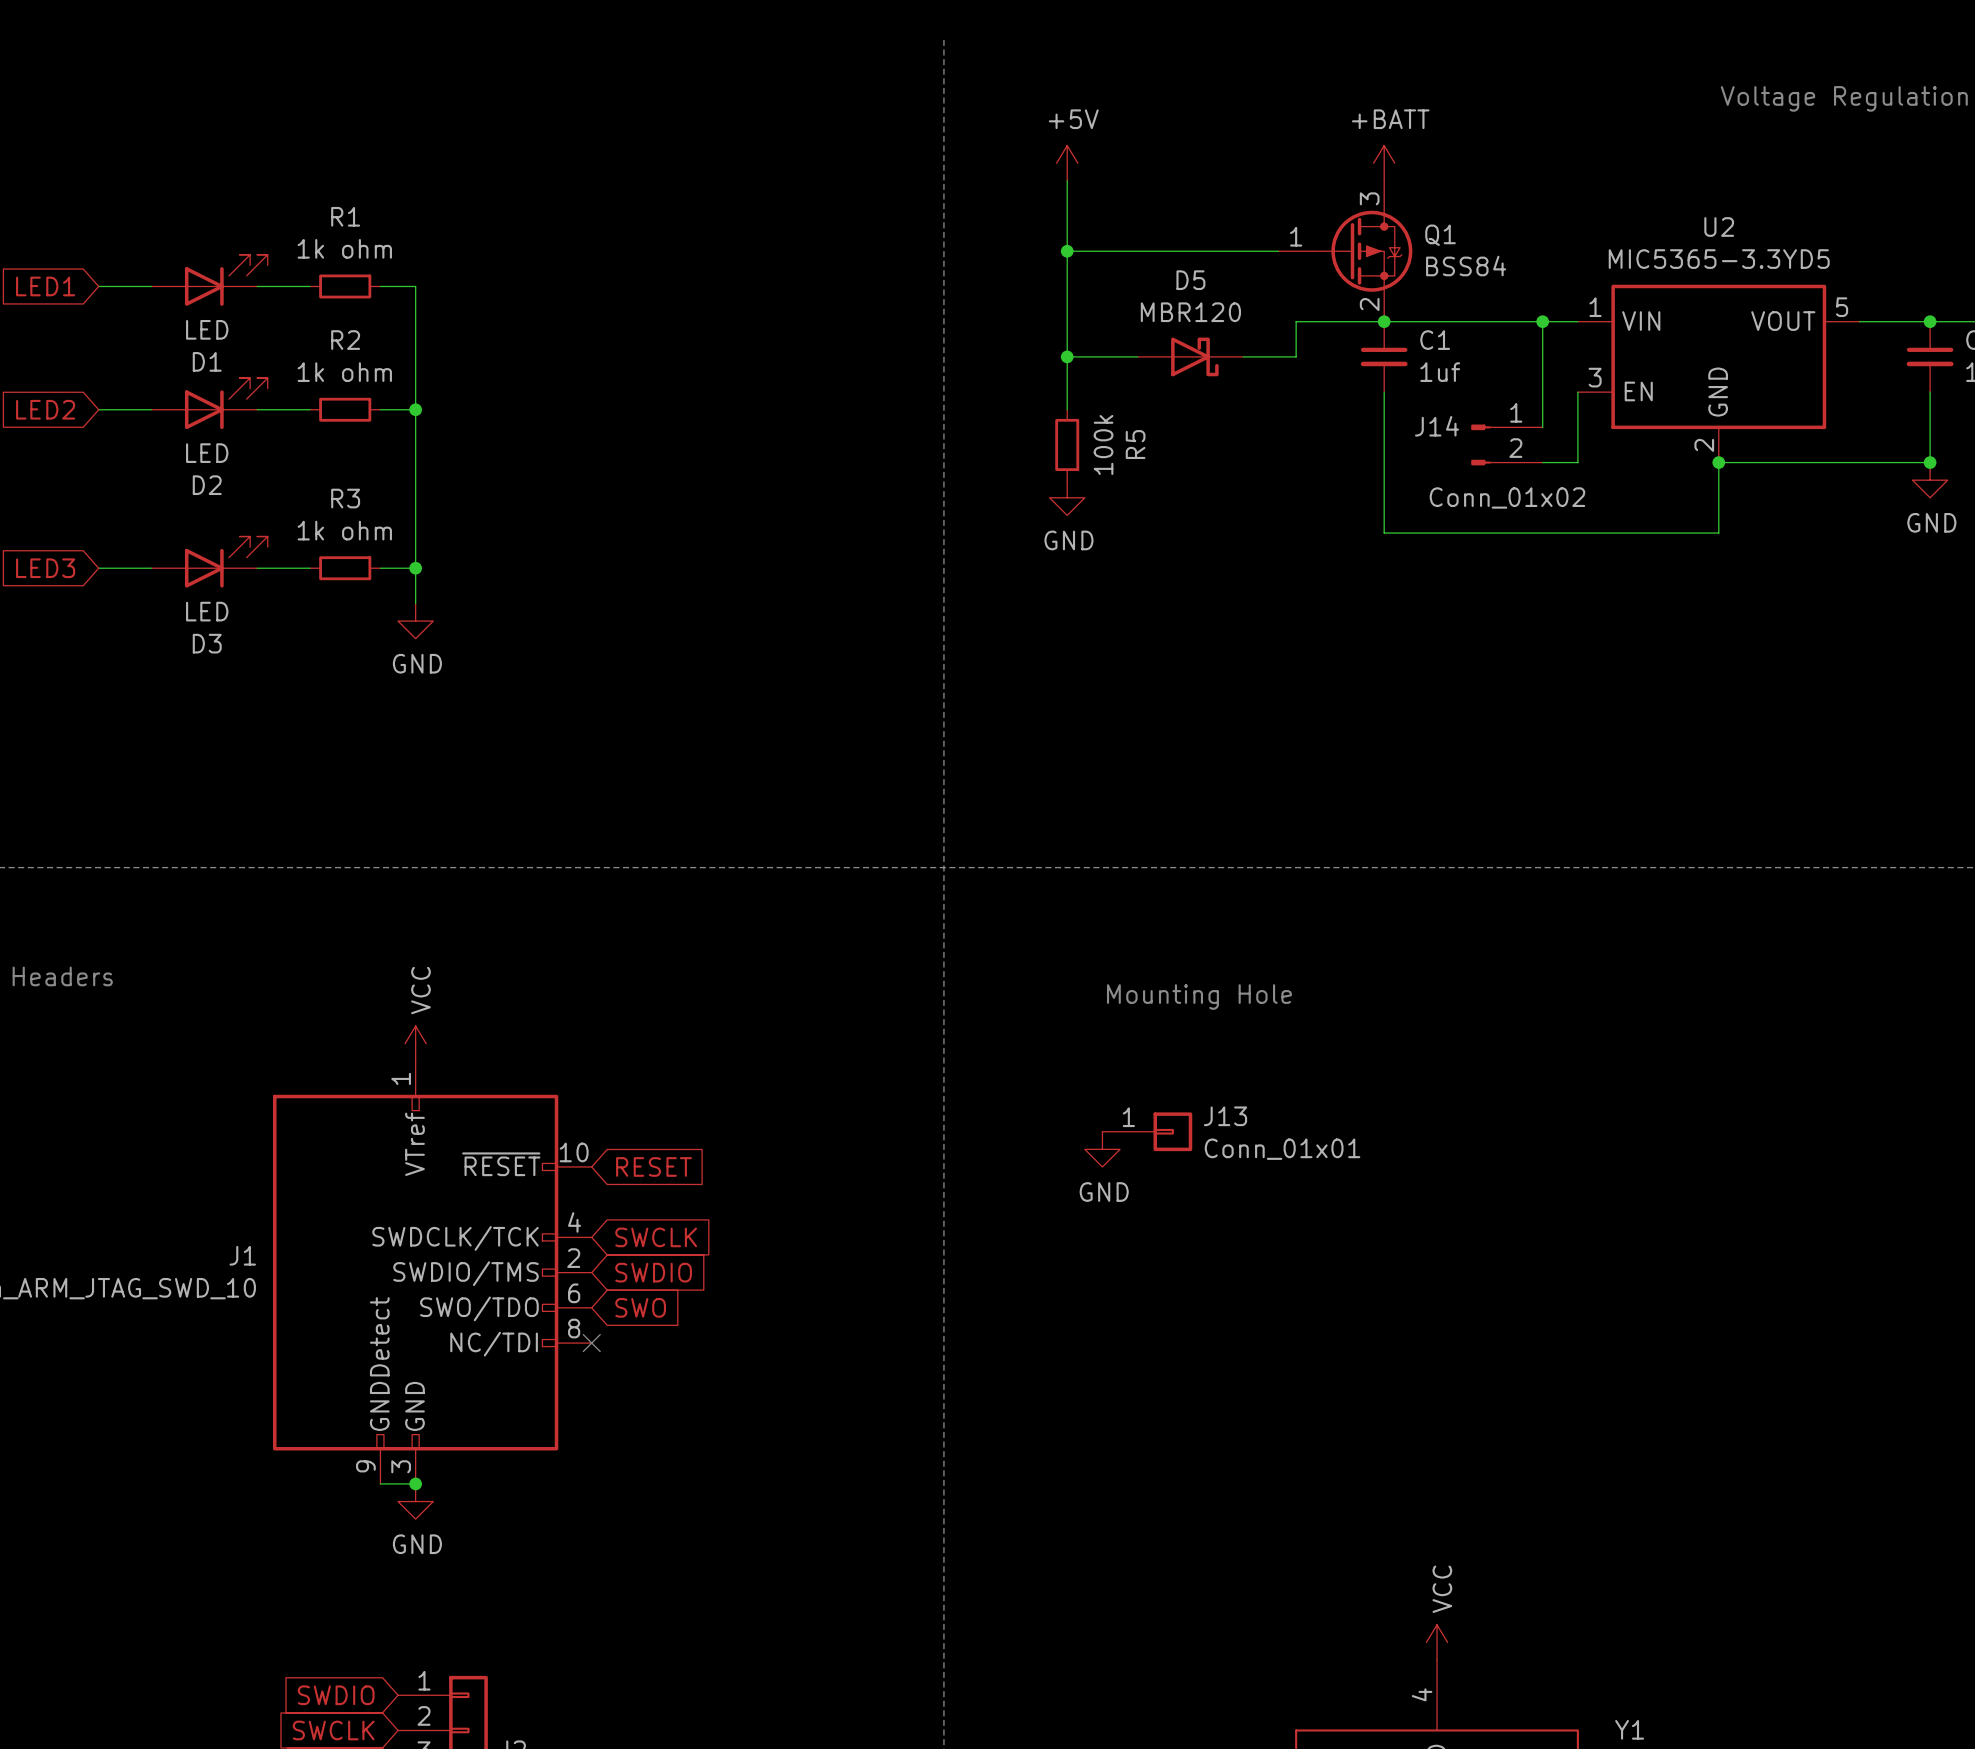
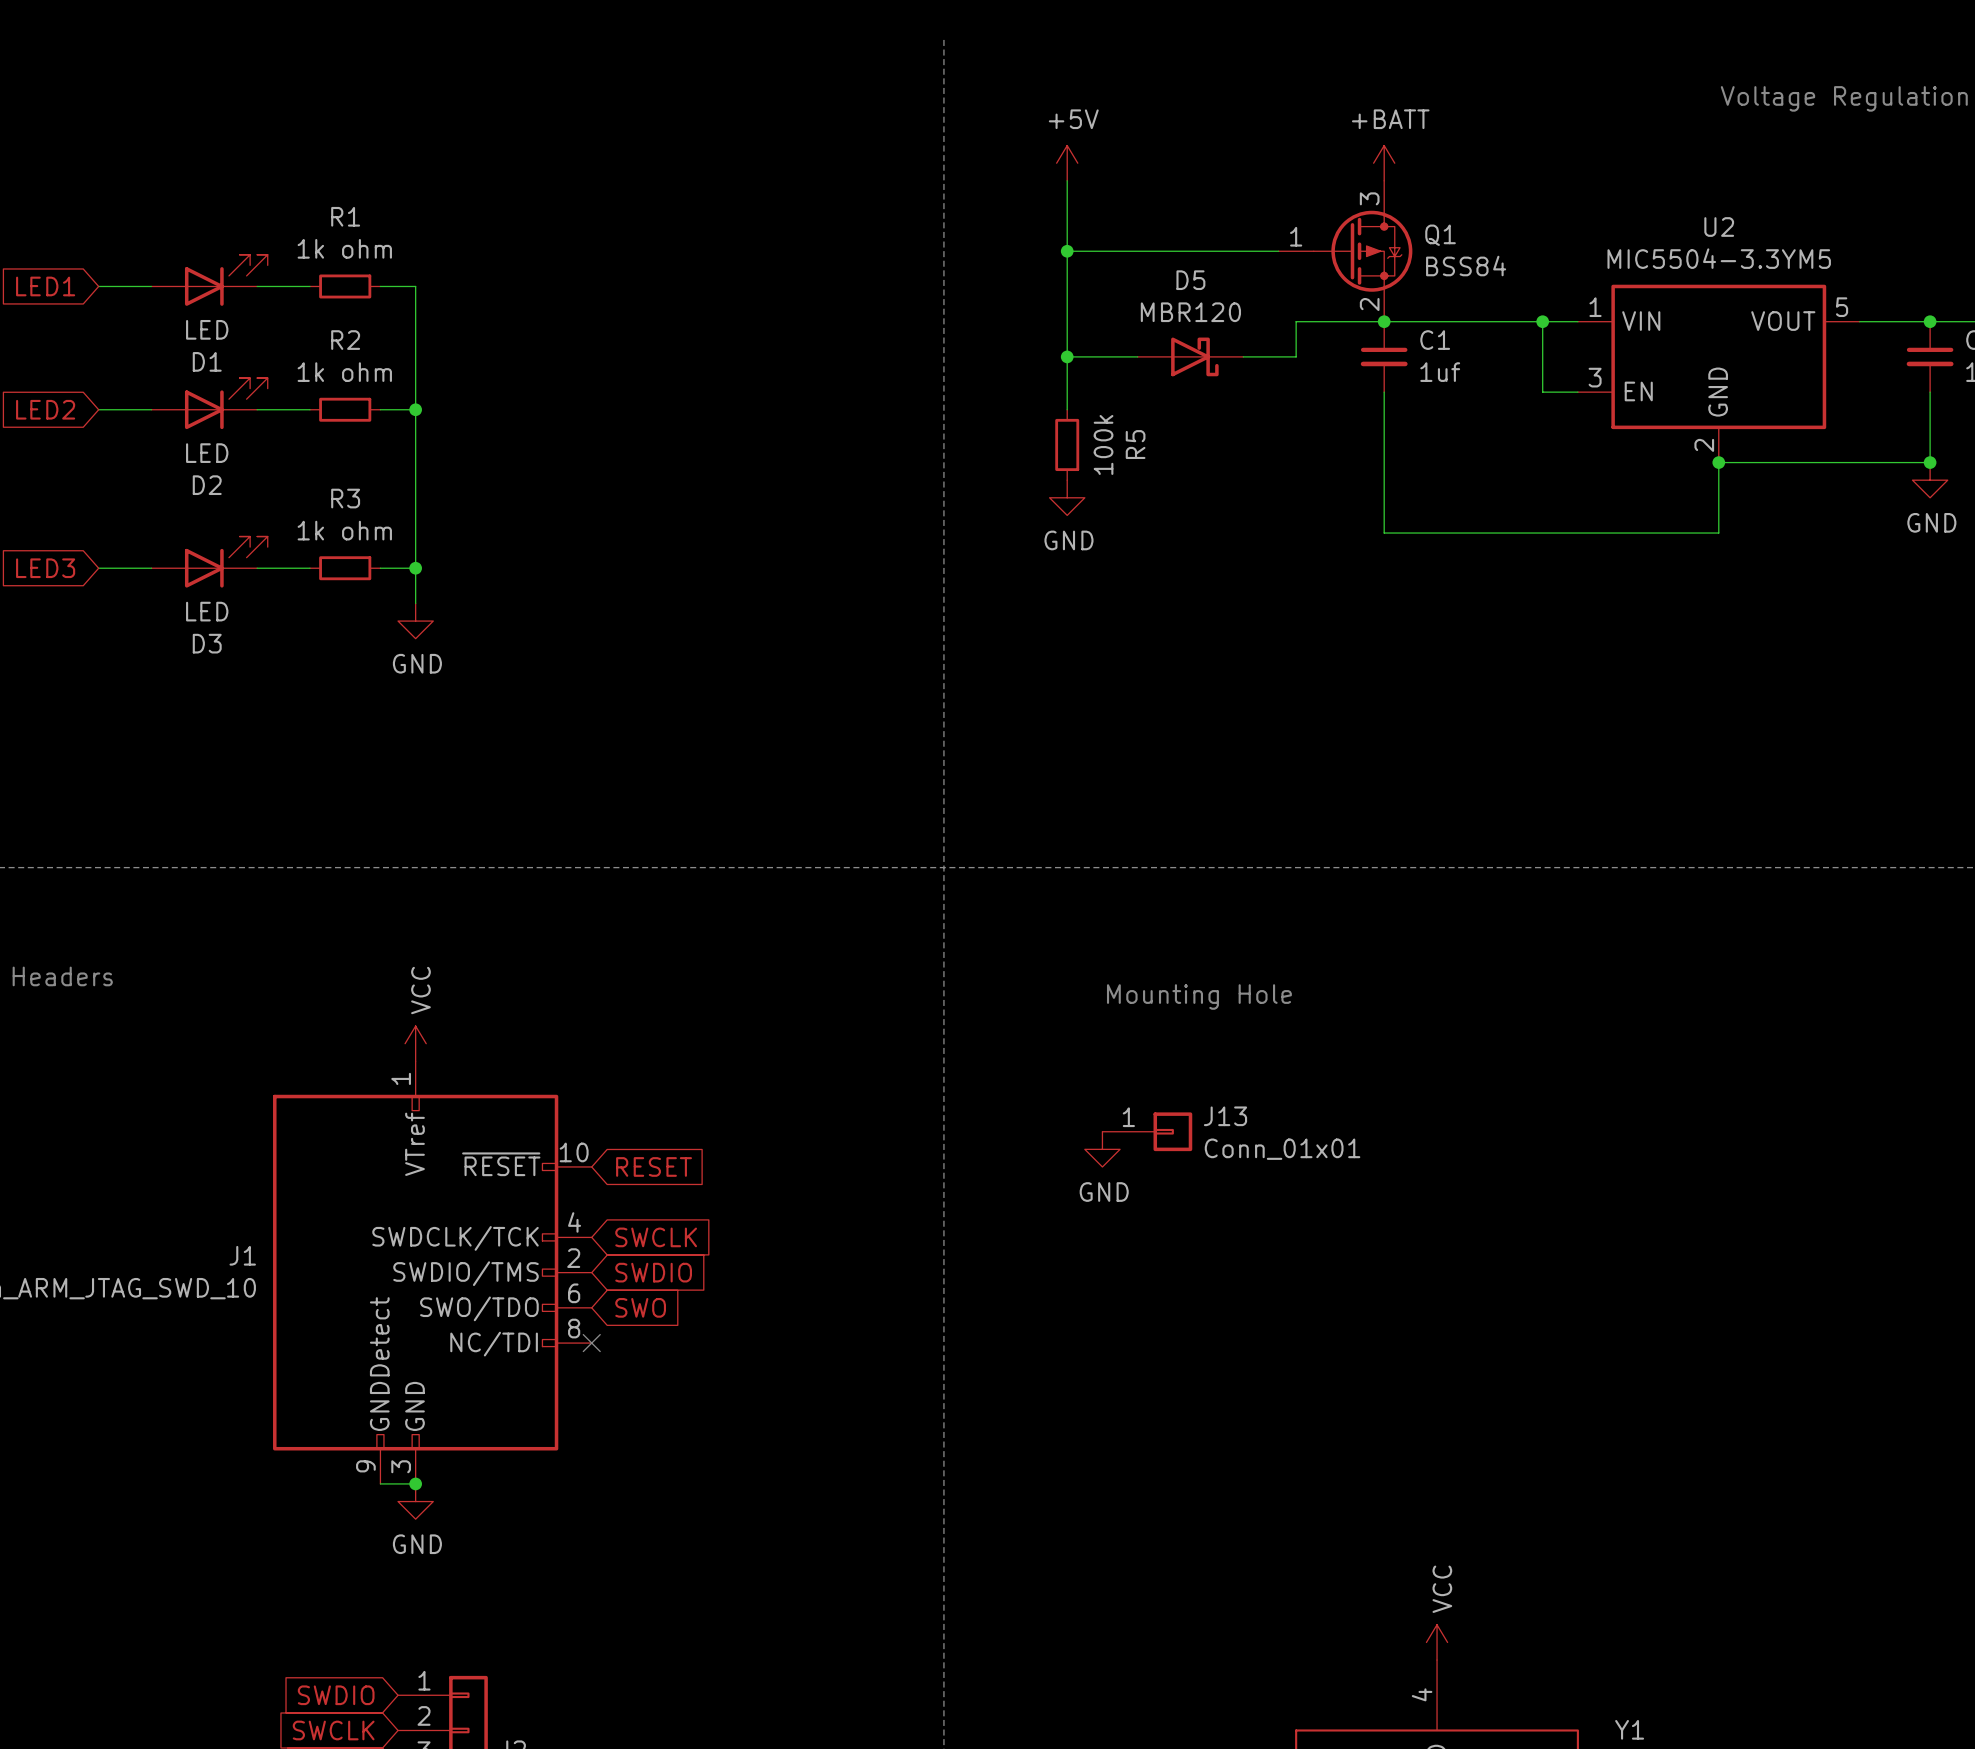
U2 value: MIC5365-3.3YD5 (1719, 259) -> MIC5504-3.3YM5 (1719, 258)
wire: (1542, 392) (1542, 427) -> (1542, 392) (1577, 392)
wire: (1577, 392) (1577, 462) (1542, 462) -> none
J14: Conn_01x02 (1506, 444) -> none

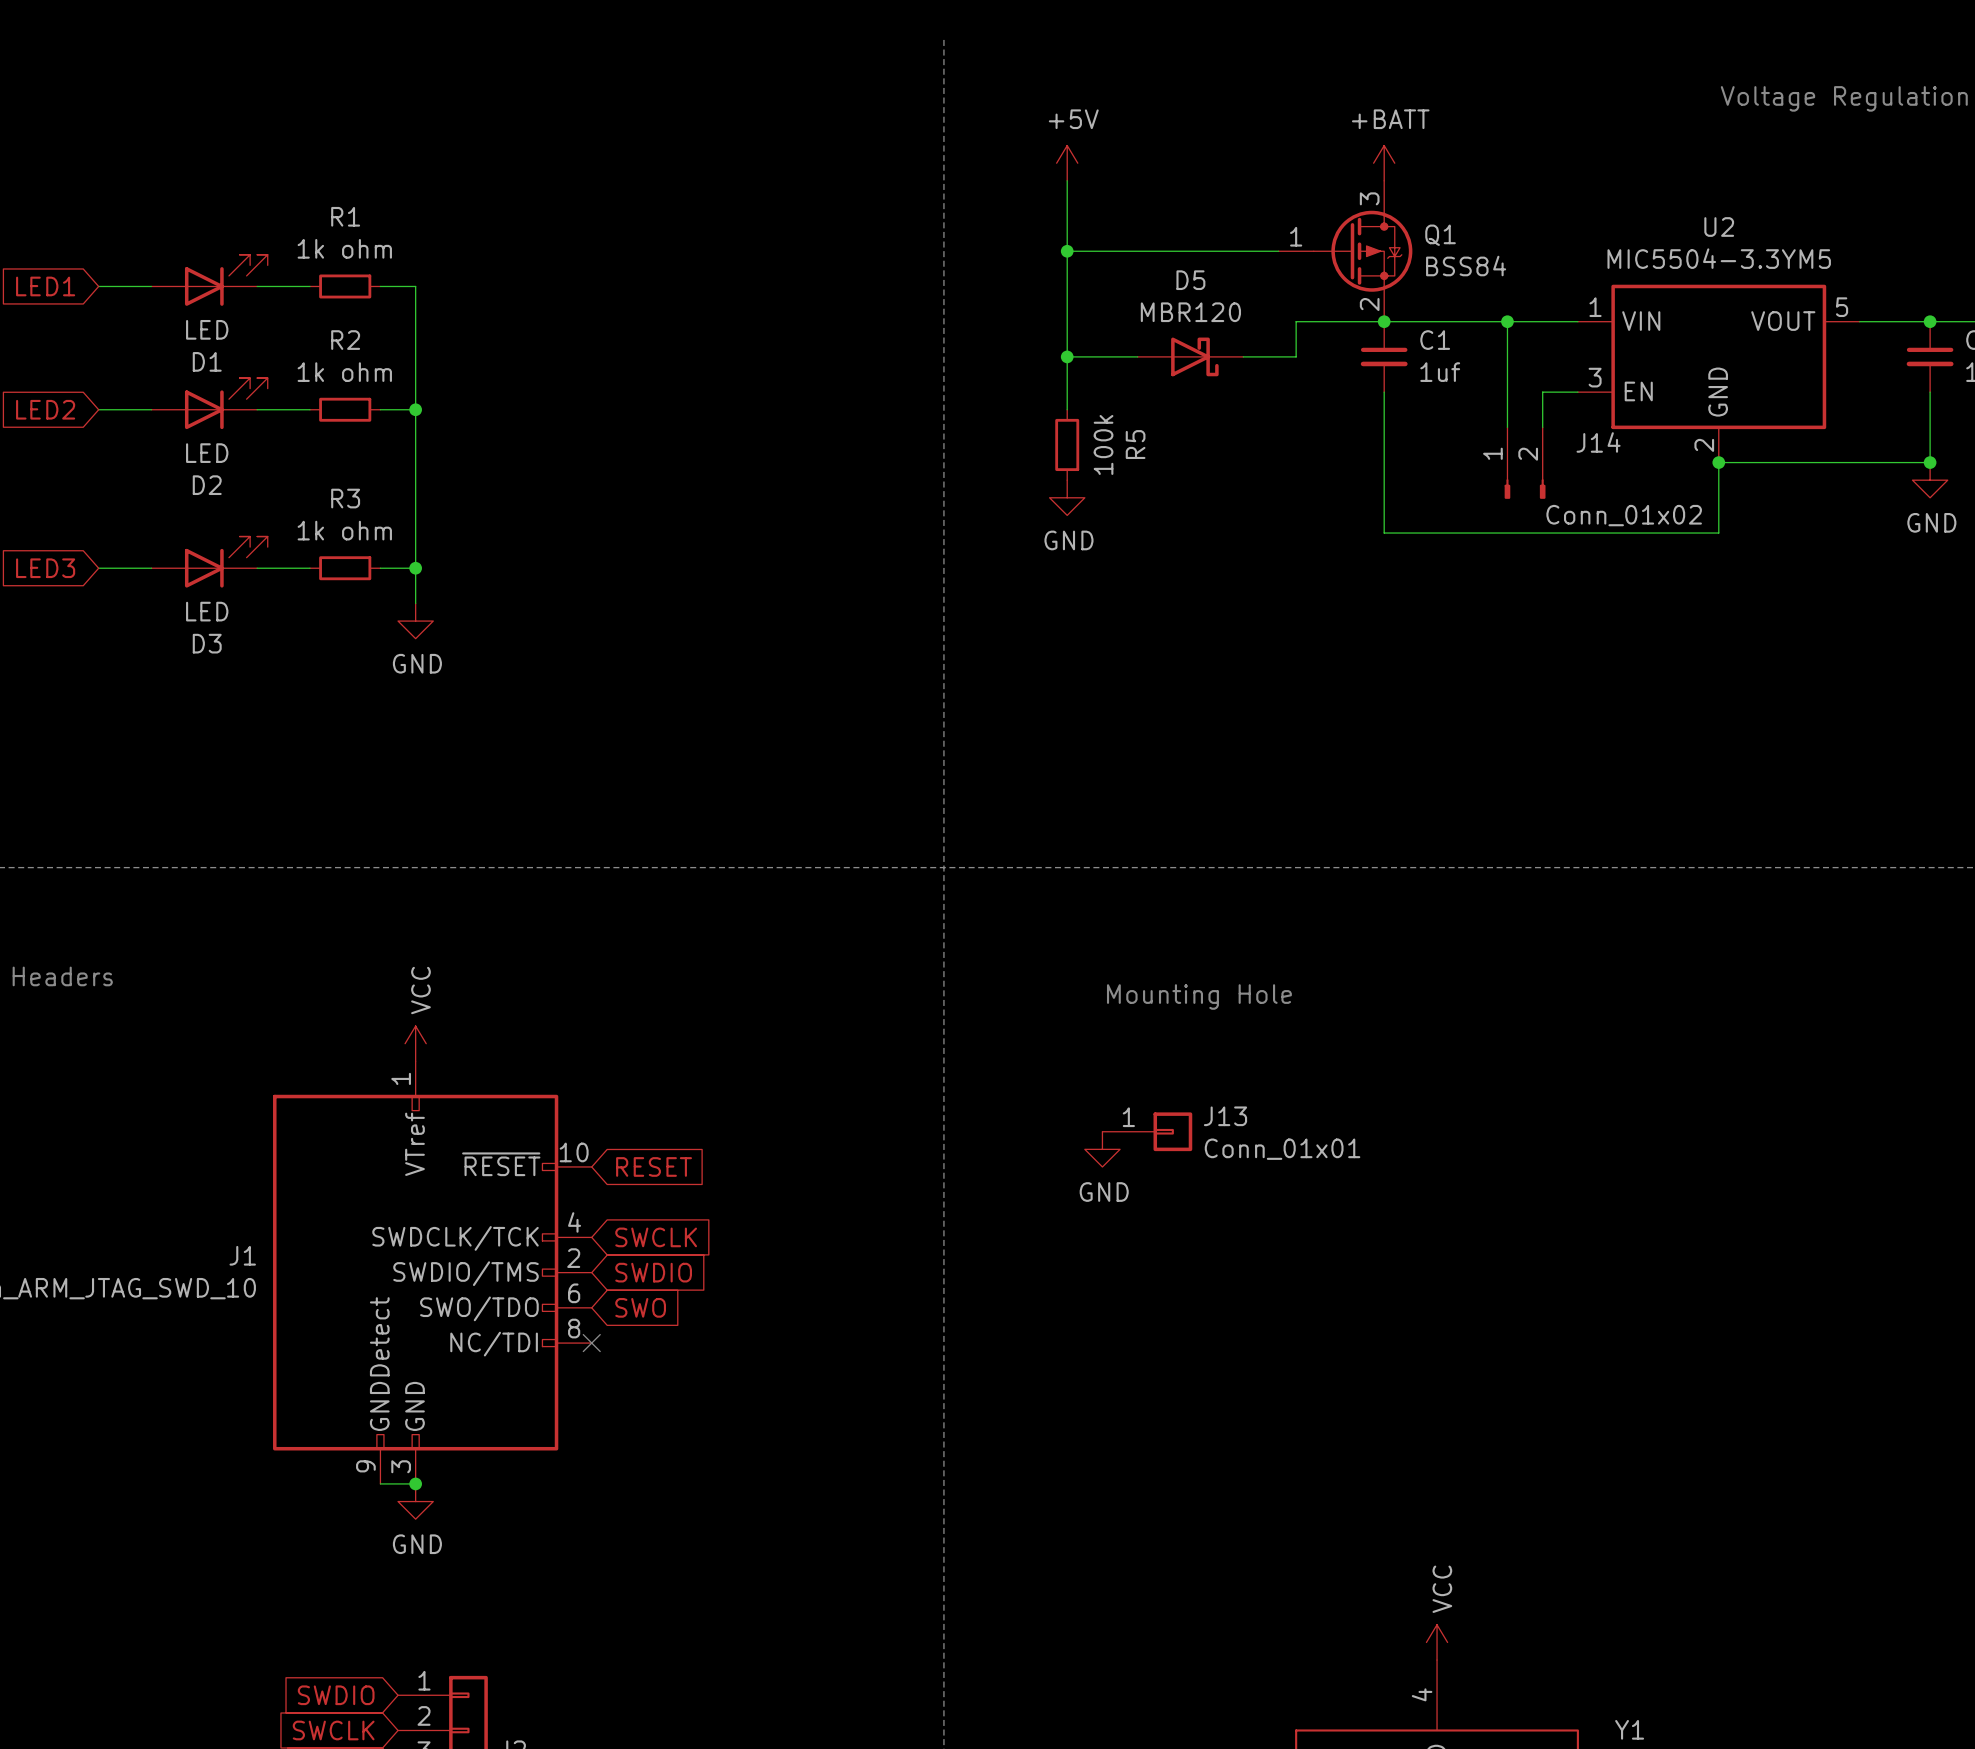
wire: none -> (1507, 321) (1507, 427)
wire: (1542, 321) (1542, 392) -> (1542, 427) (1542, 392)
junction position: (1542, 321) -> (1507, 321)
J14: none -> Conn_01x02 (1525, 463)

